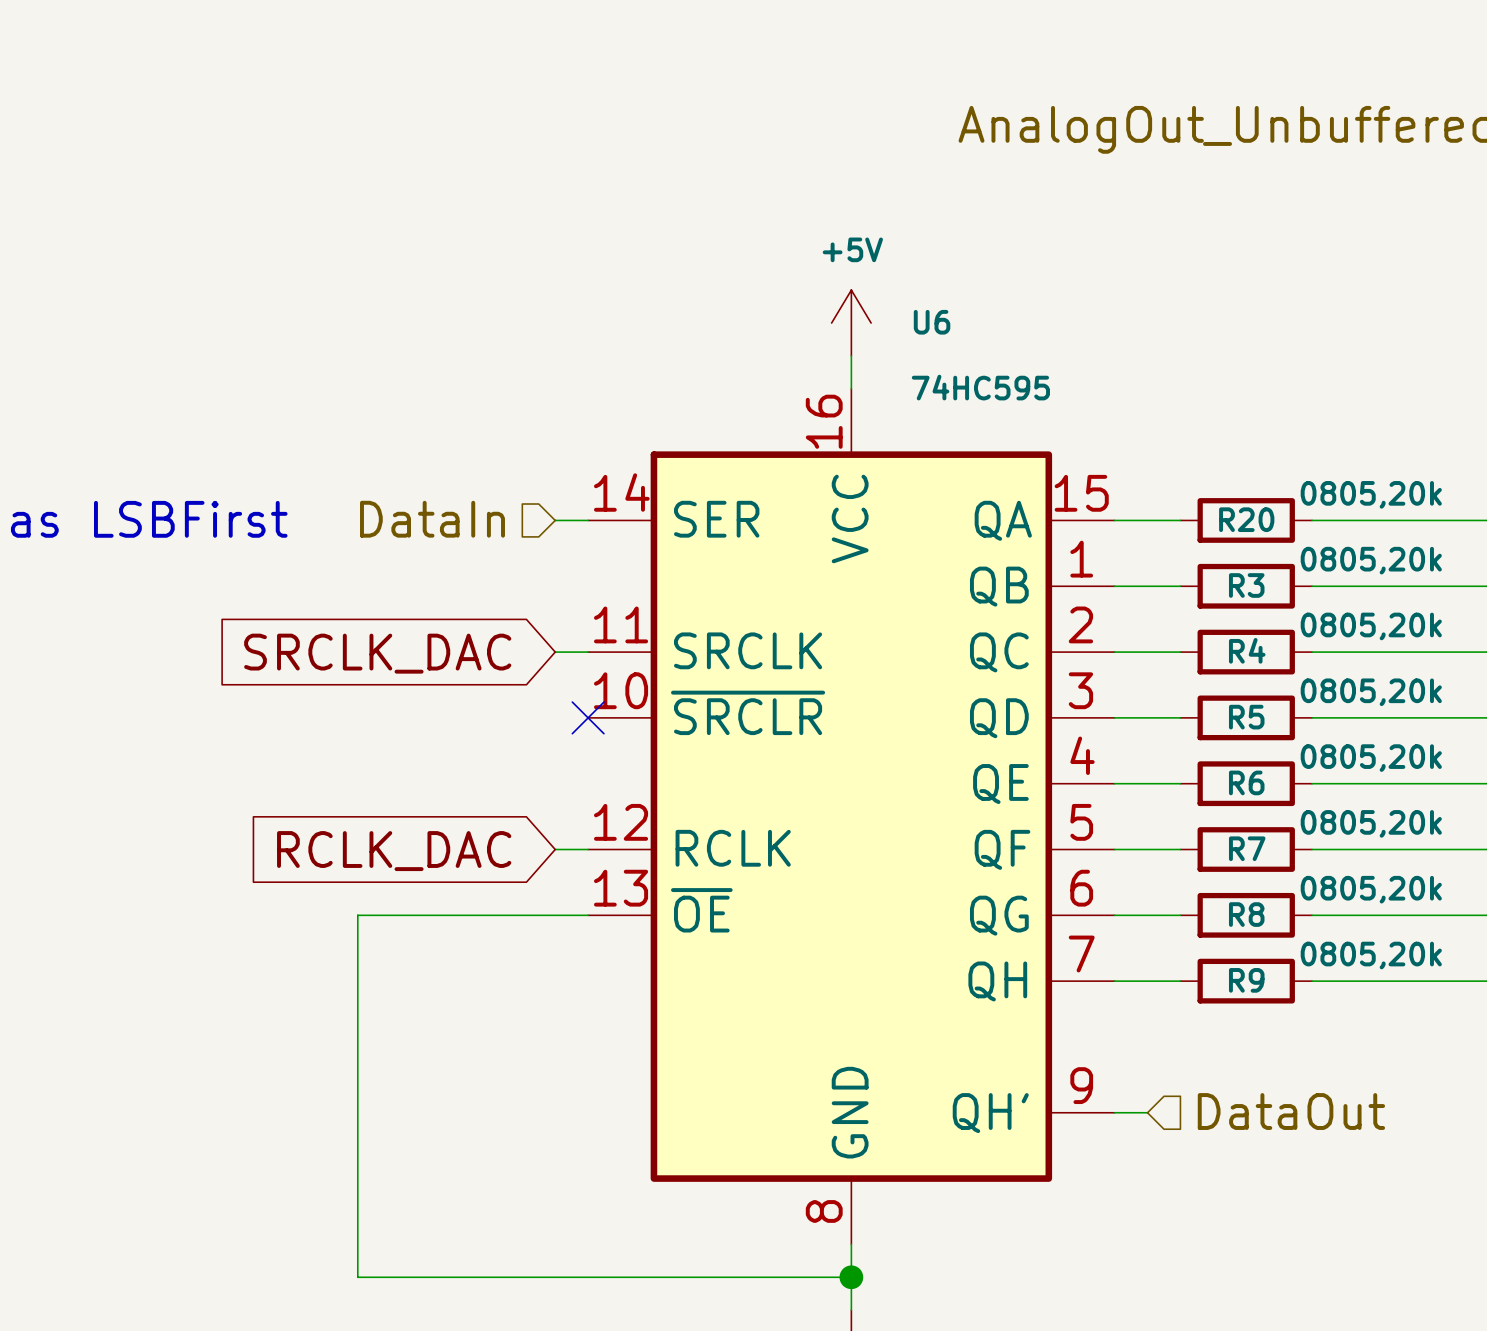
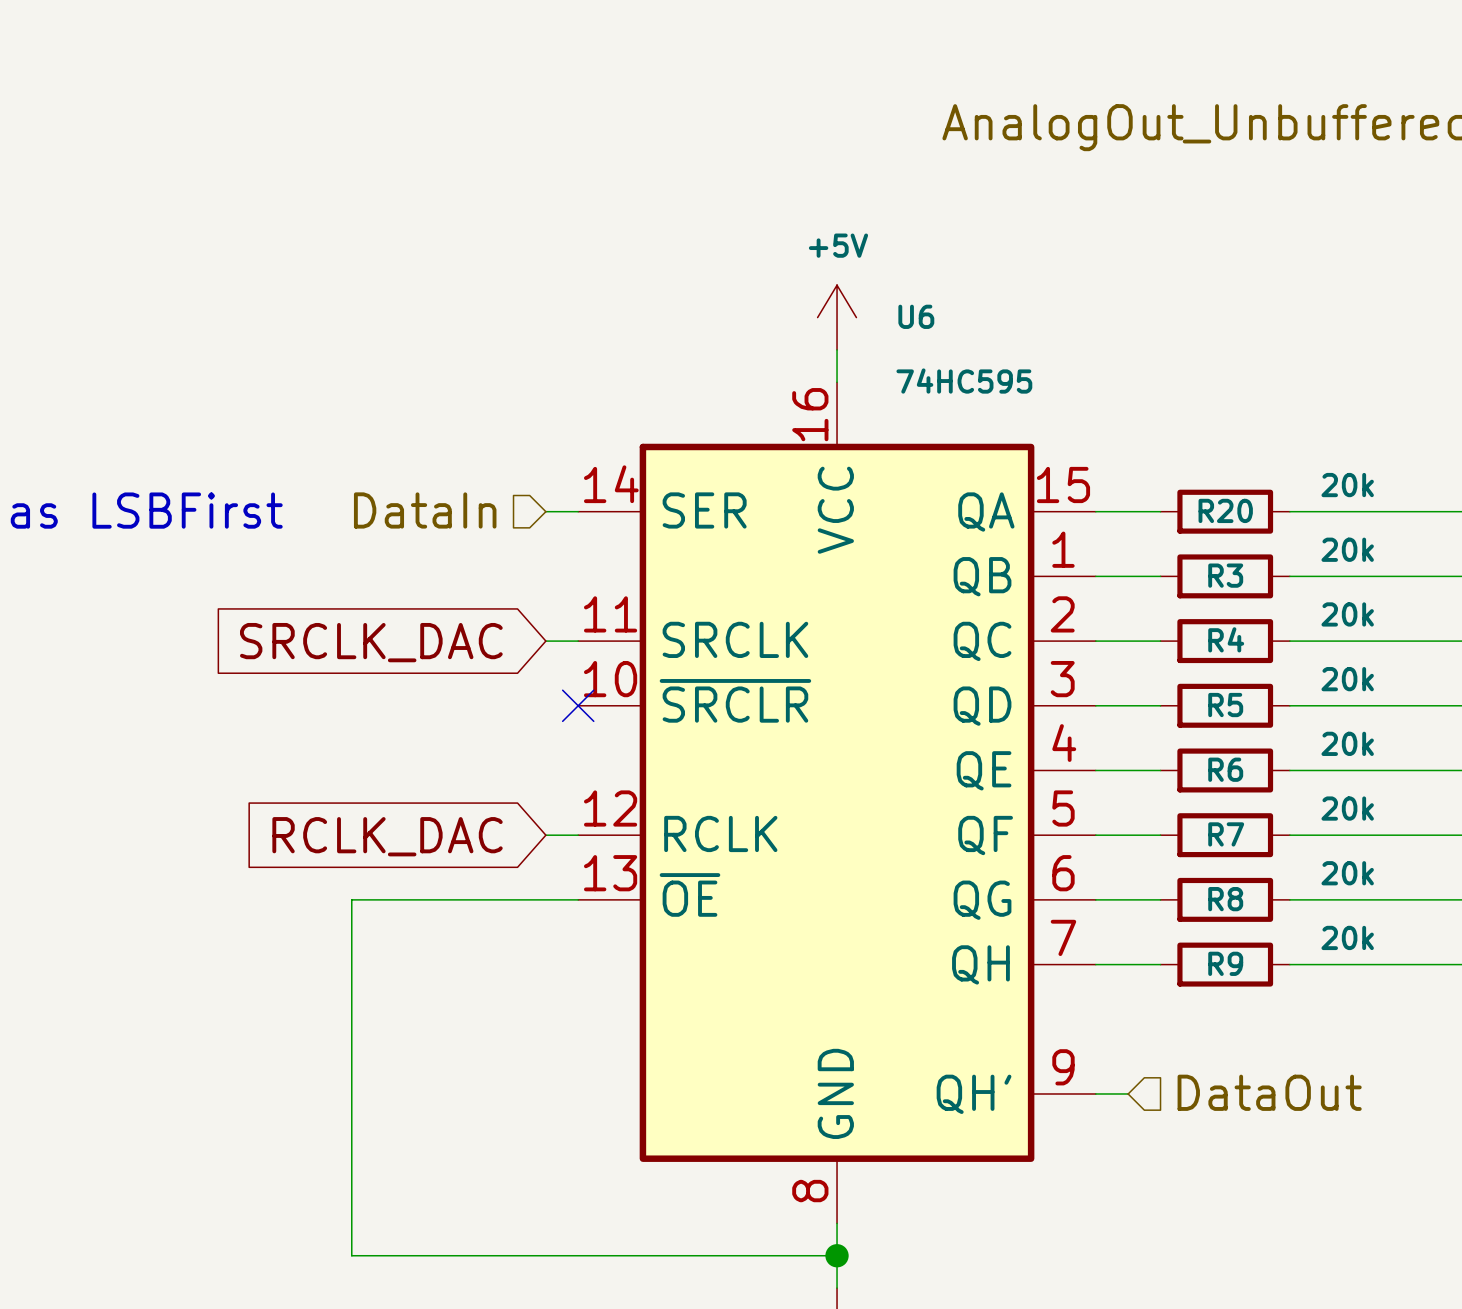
R20 value: 0805,20k (1371, 494) -> 20k (1347, 485)
R3 value: 0805,20k (1371, 560) -> 20k (1347, 549)
R4 value: 0805,20k (1371, 626) -> 20k (1347, 614)
R5 value: 0805,20k (1371, 692) -> 20k (1347, 679)
R6 value: 0805,20k (1371, 758) -> 20k (1347, 743)
R7 value: 0805,20k (1371, 823) -> 20k (1347, 808)
R8 value: 0805,20k (1371, 889) -> 20k (1347, 873)
R9 value: 0805,20k (1371, 955) -> 20k (1347, 937)

